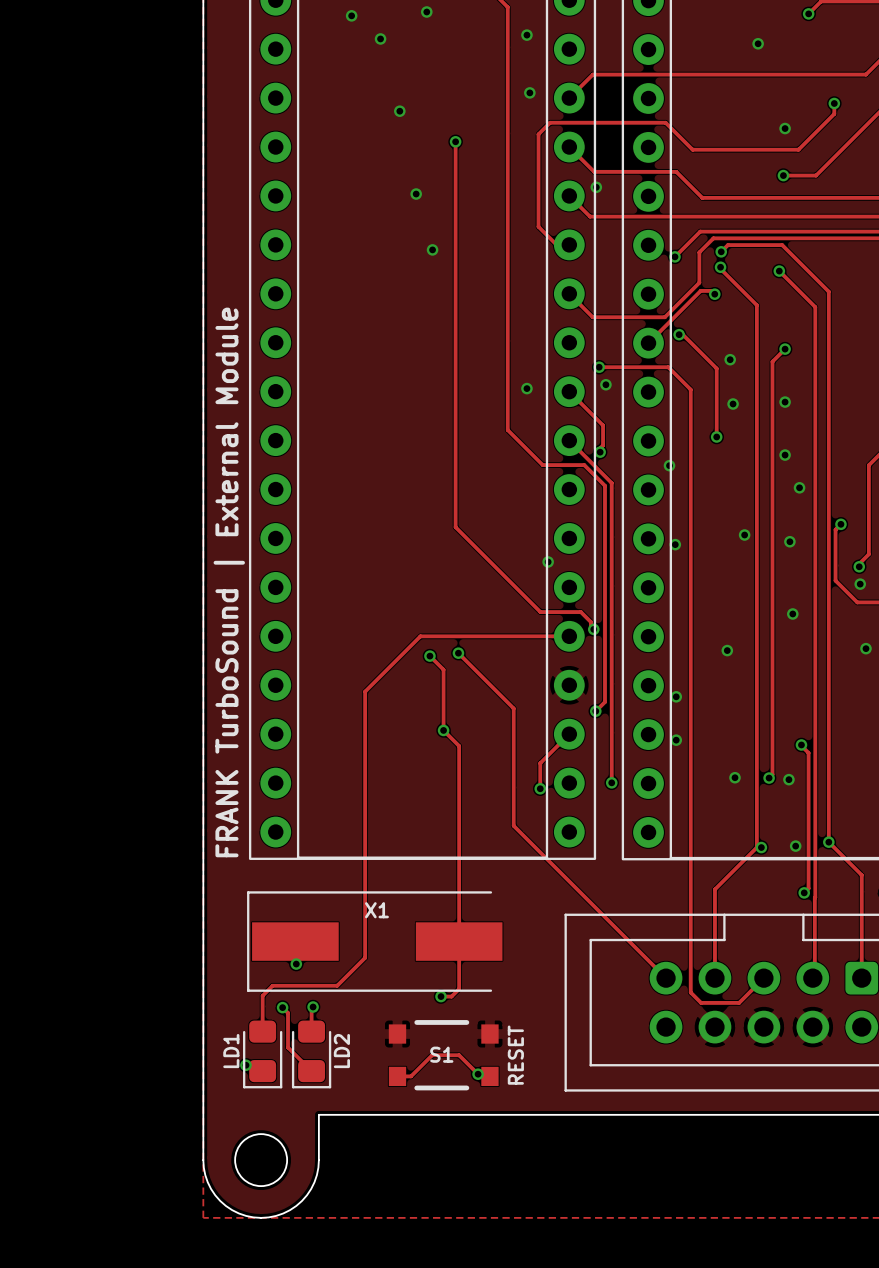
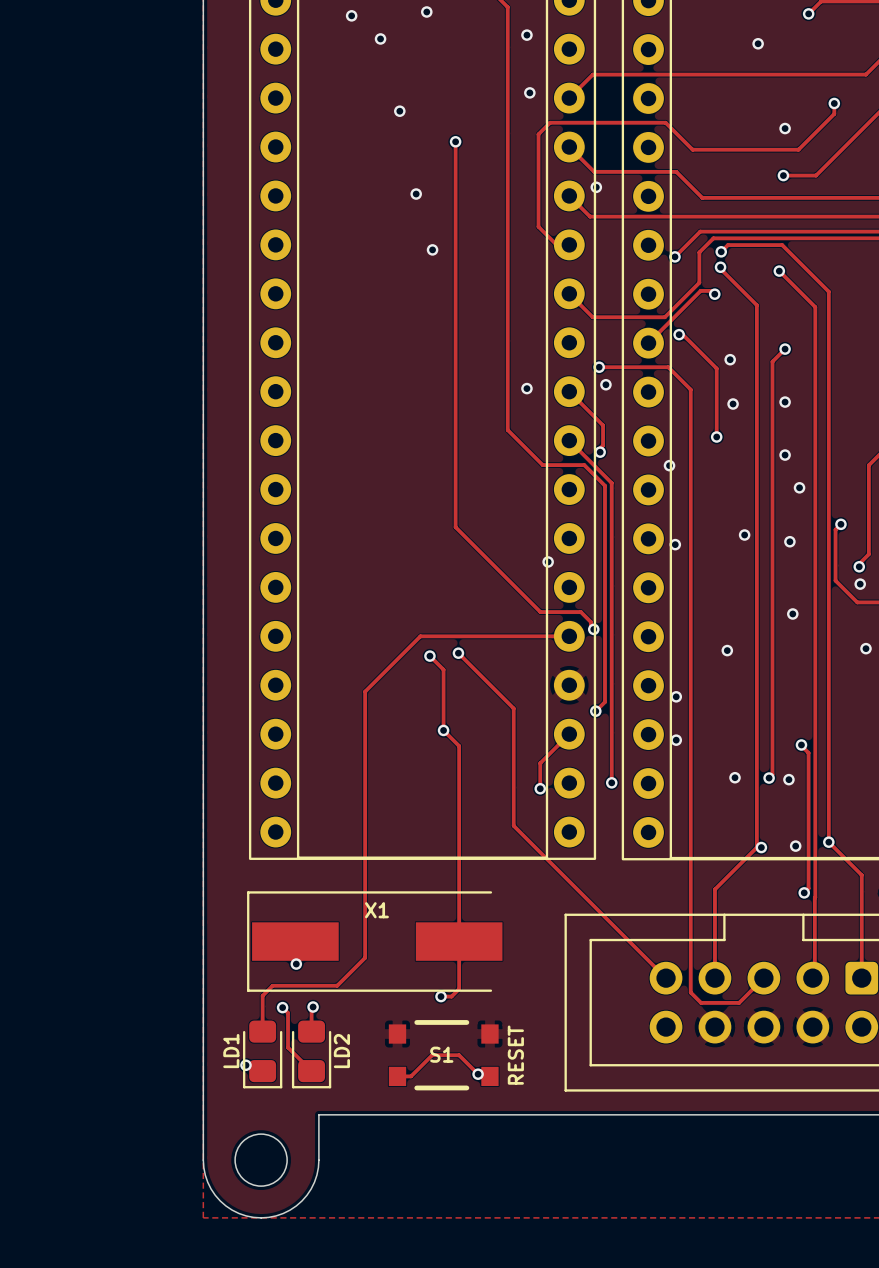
text: FRANK TurboSound | External Module (229, 582) -> none

